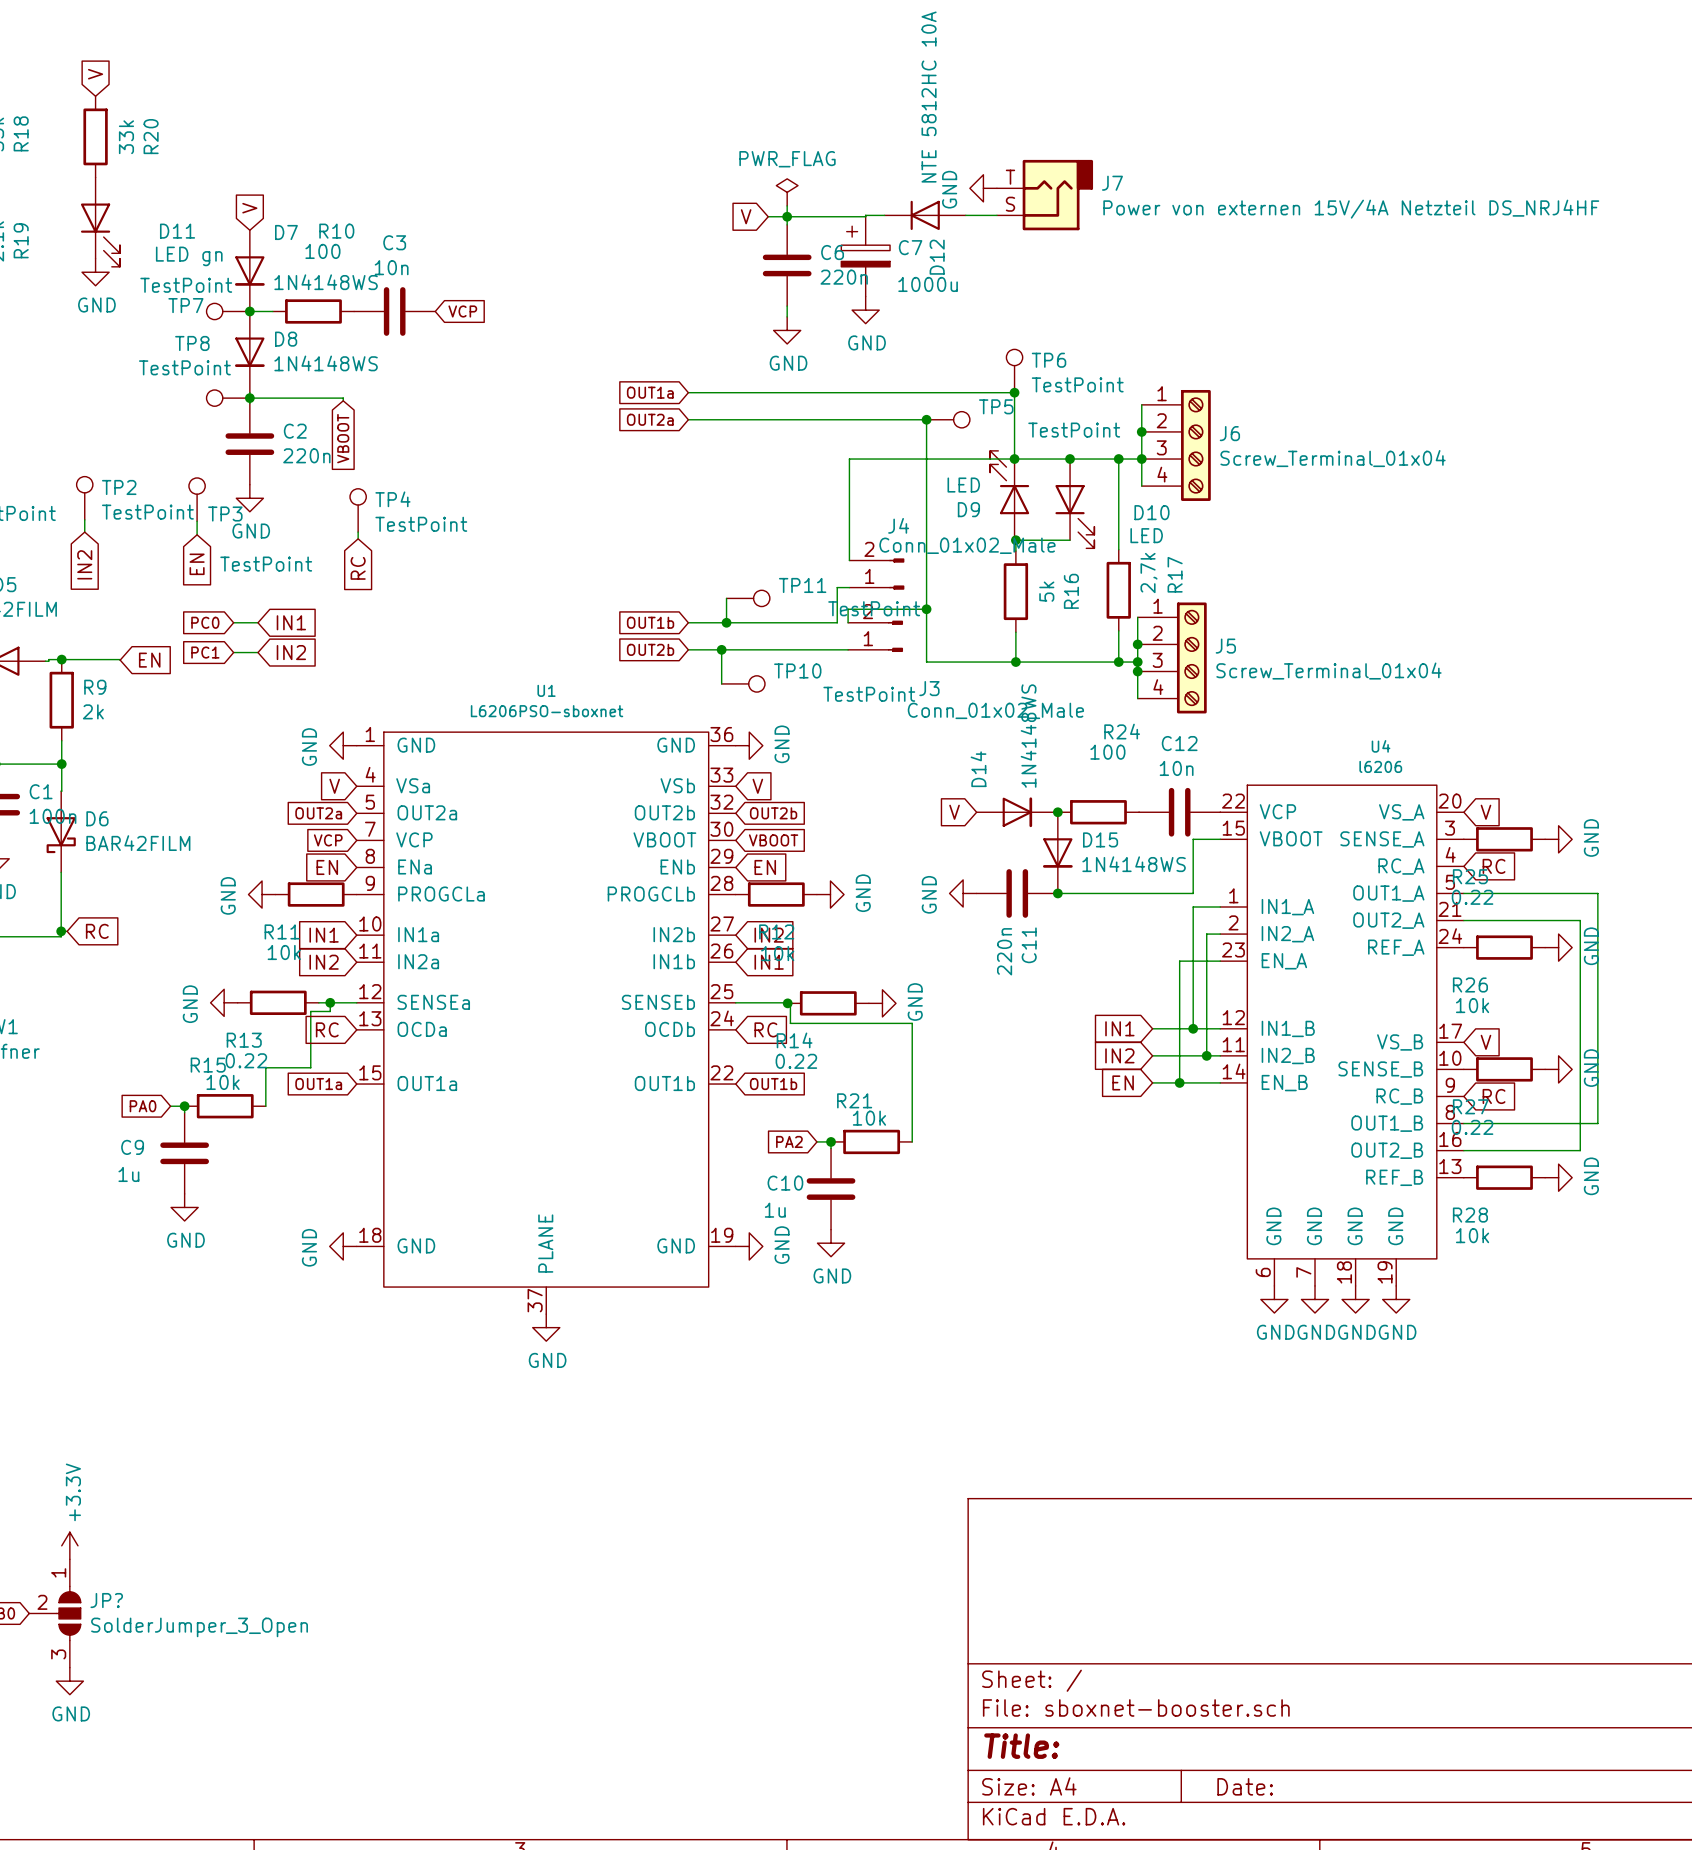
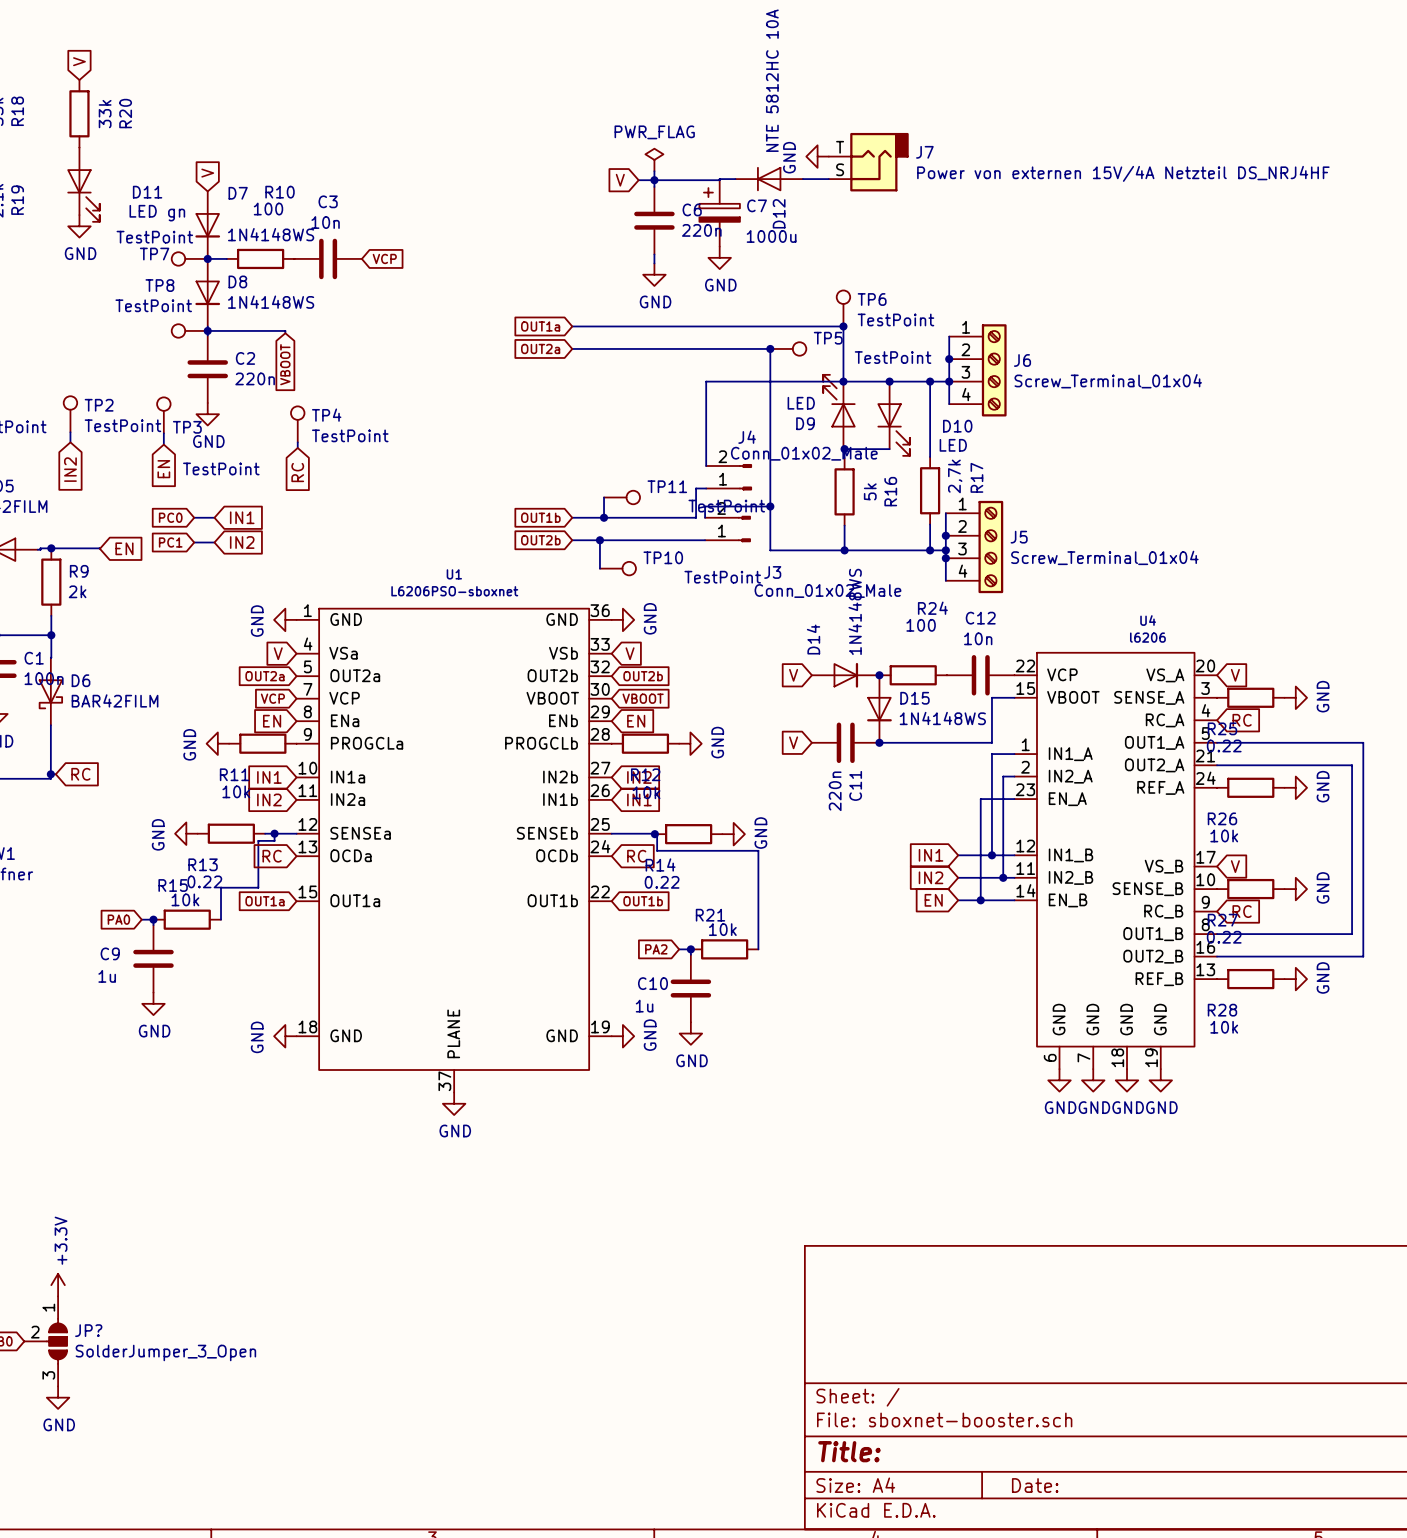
global label: none -> V (793, 742)
power symbol: GND (963, 893) -> none
wire: (1597, 893) (1597, 1123) -> (1328, 742) (1363, 742) (1363, 956) (1313, 956)
wire: (1580, 920) (1580, 1150) -> (1313, 765) (1352, 765) (1352, 934) (1328, 934)

